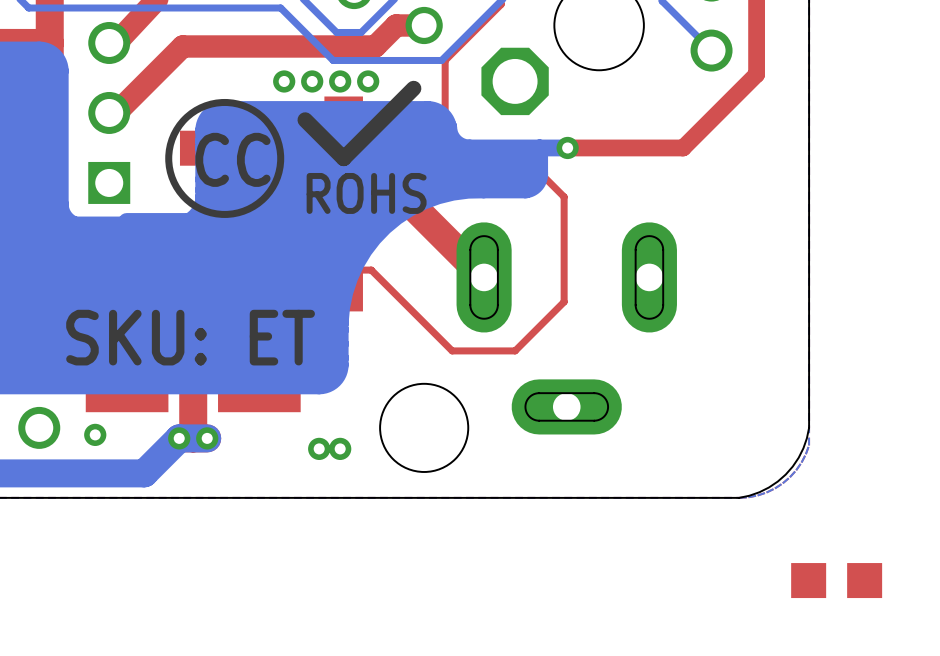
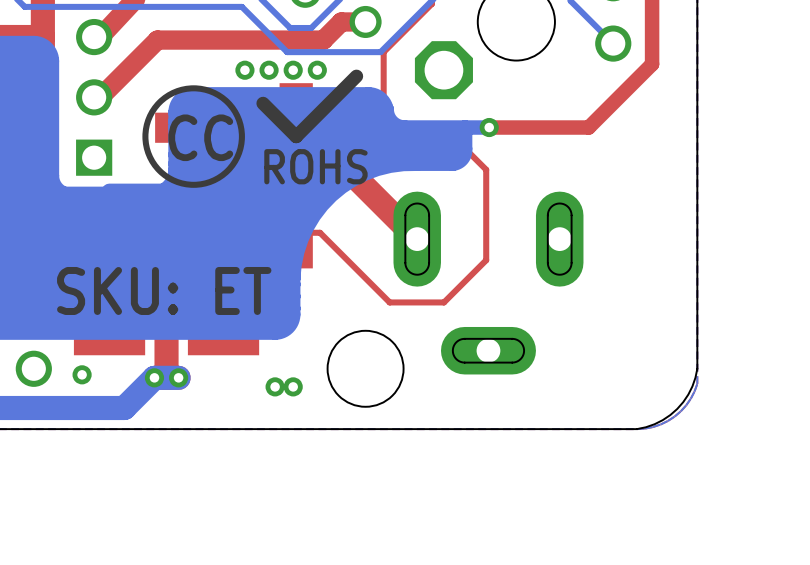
part: (836, 580) -> none

